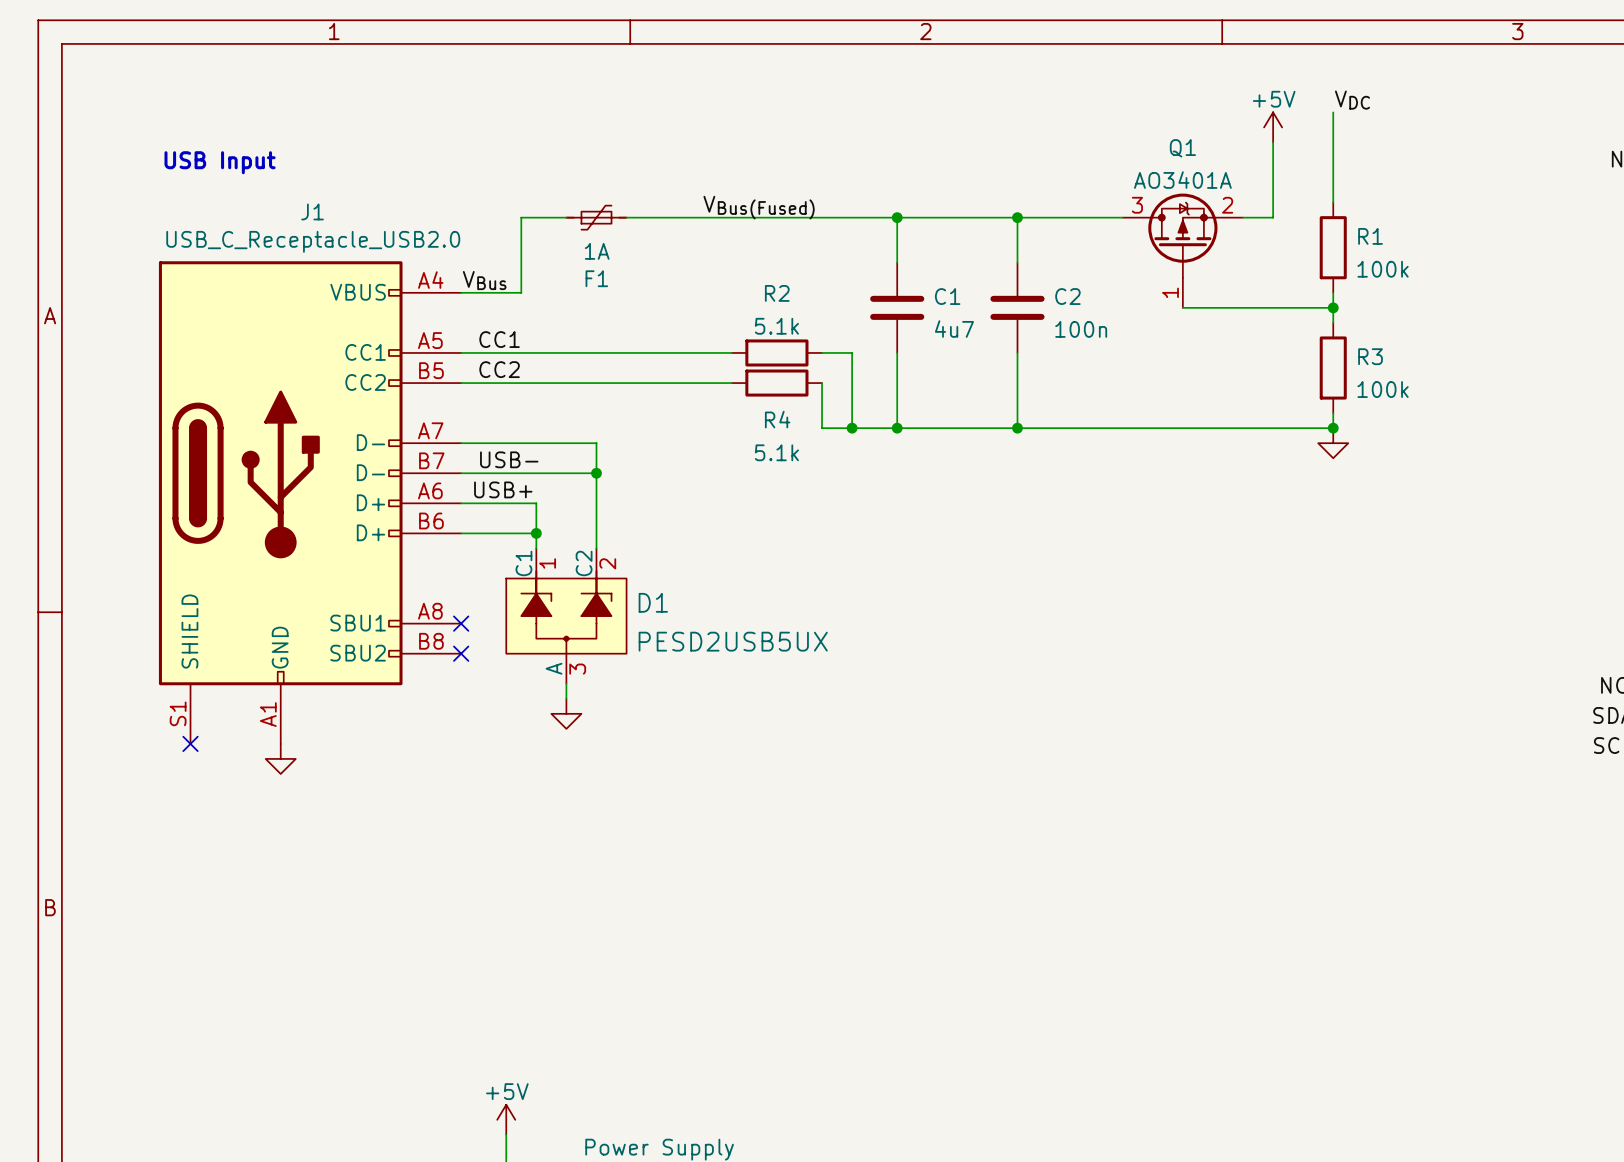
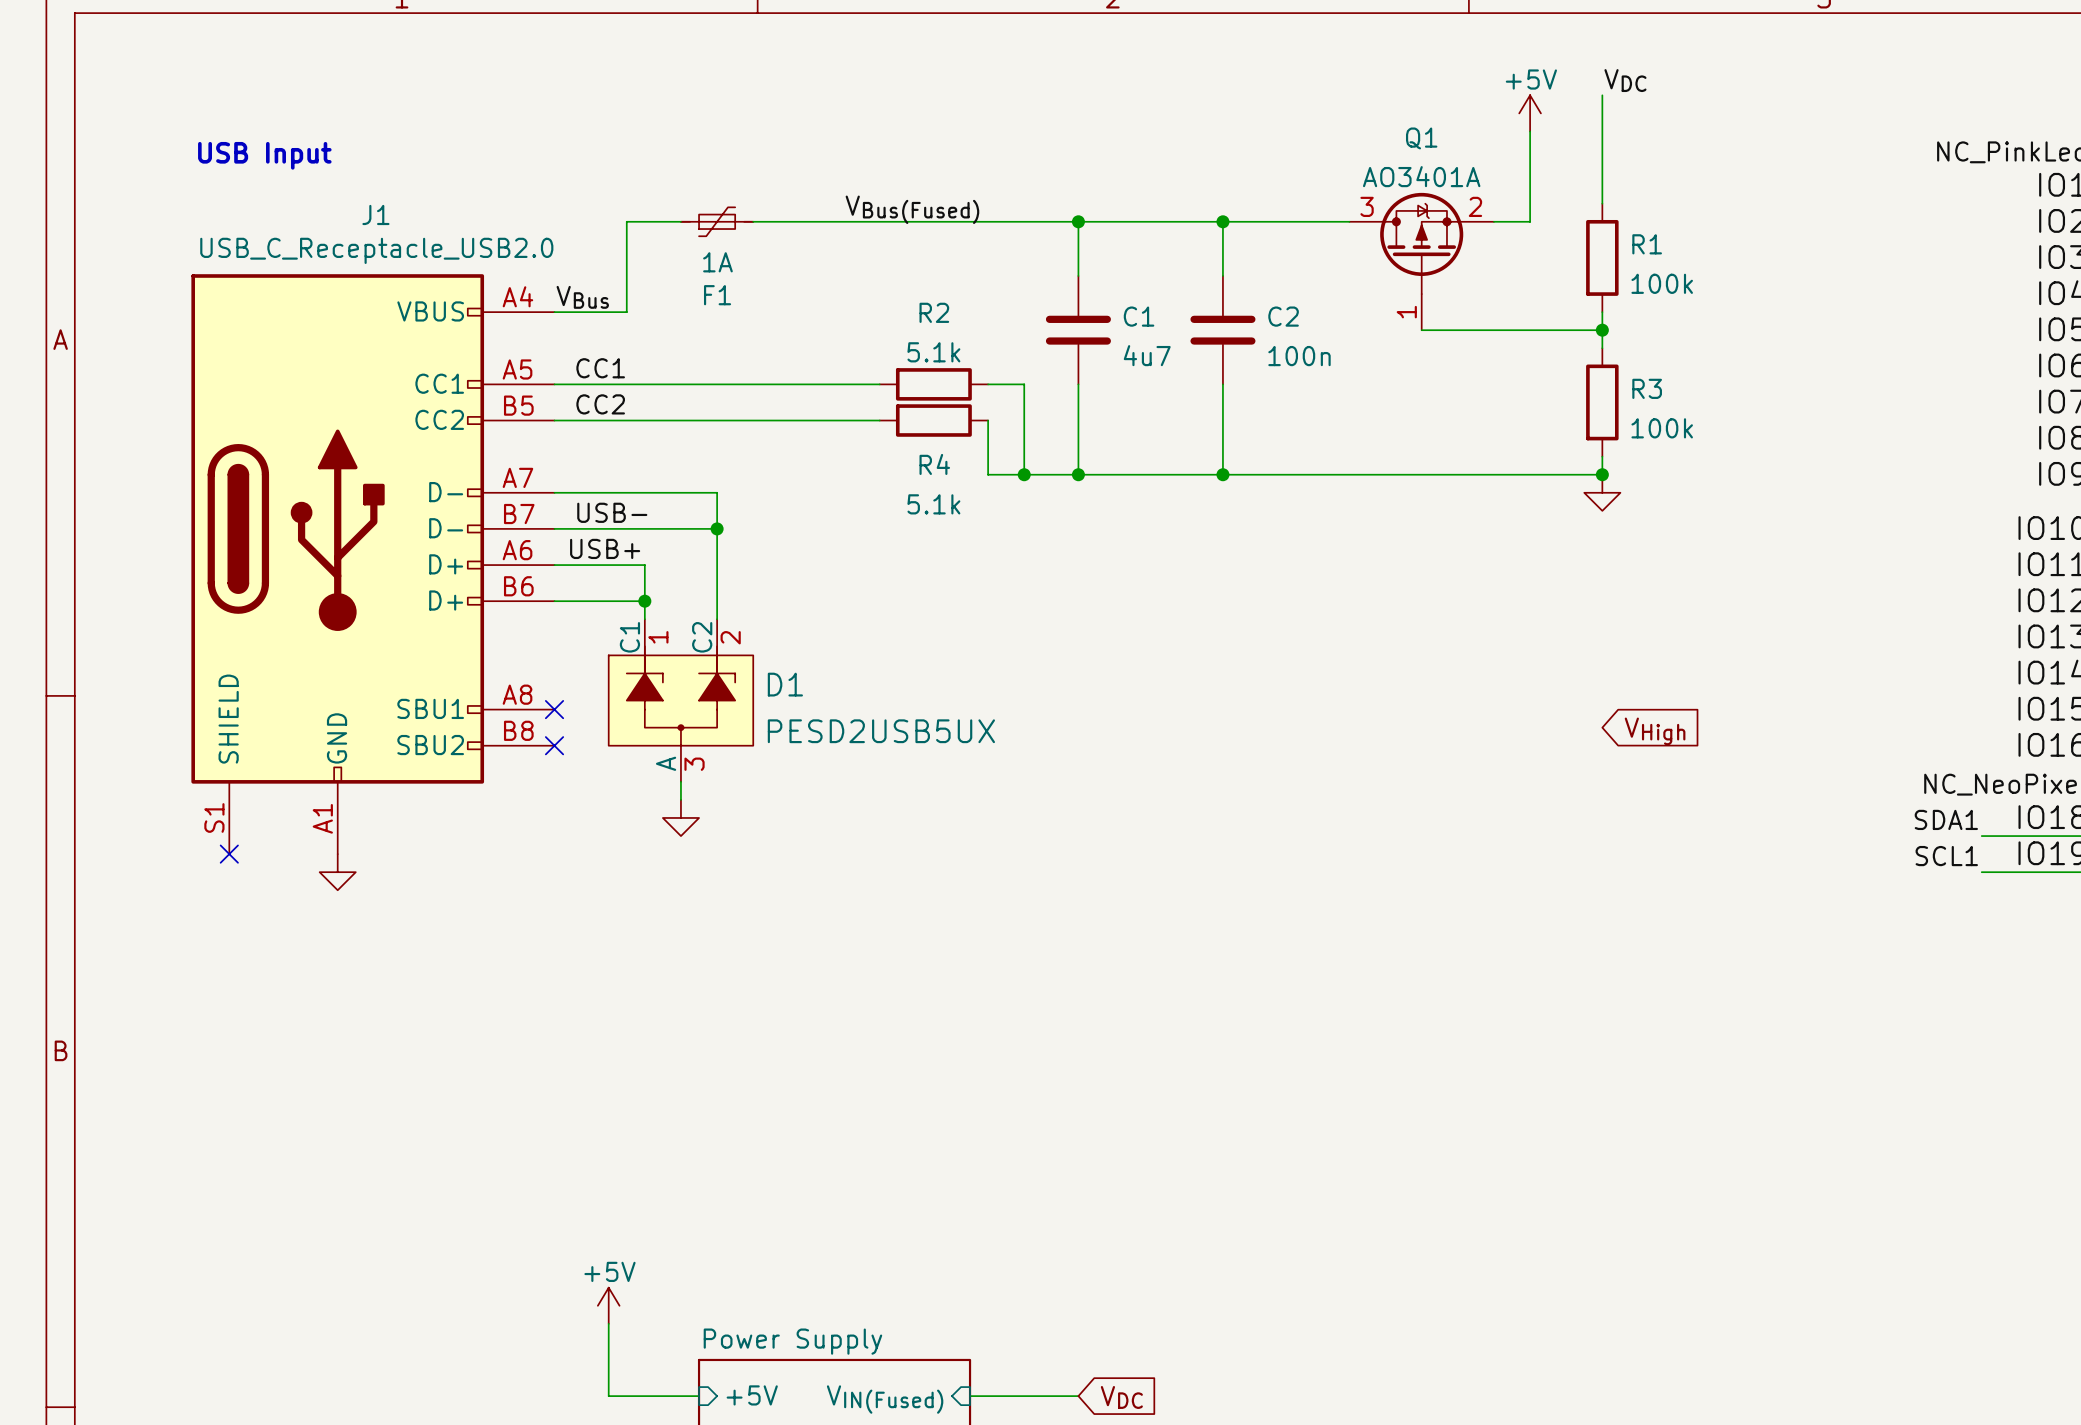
global label: none -> VHigh (1655, 731)

